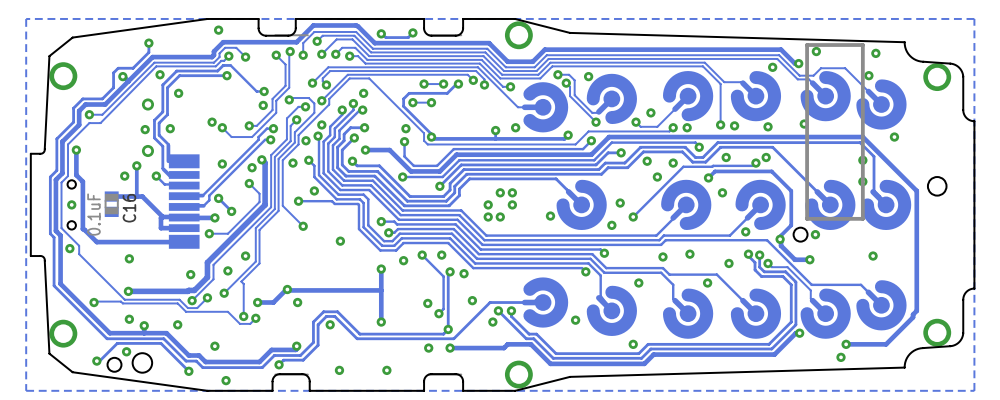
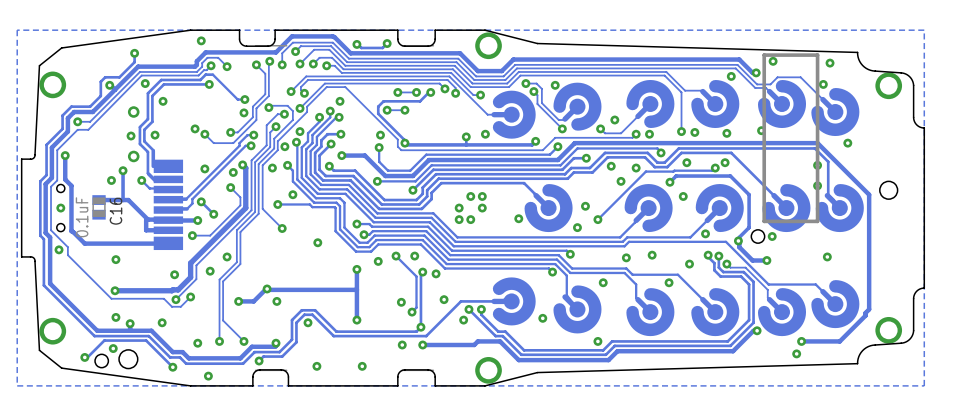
track: (237, 279) (224, 293) -> (219, 279) (219, 341)
track: (241, 281) (243, 283) (243, 318) -> (223, 281) (223, 320) (243, 341)
via: (224, 293) -> none
track: (94, 302) (177, 303) (186, 311) (227, 311) (239, 323) (250, 323) (255, 318) -> none
via: (94, 302) -> none
via: (243, 316) -> none
via: (255, 318) -> none
via: none -> (219, 341)
via: none -> (243, 341)

